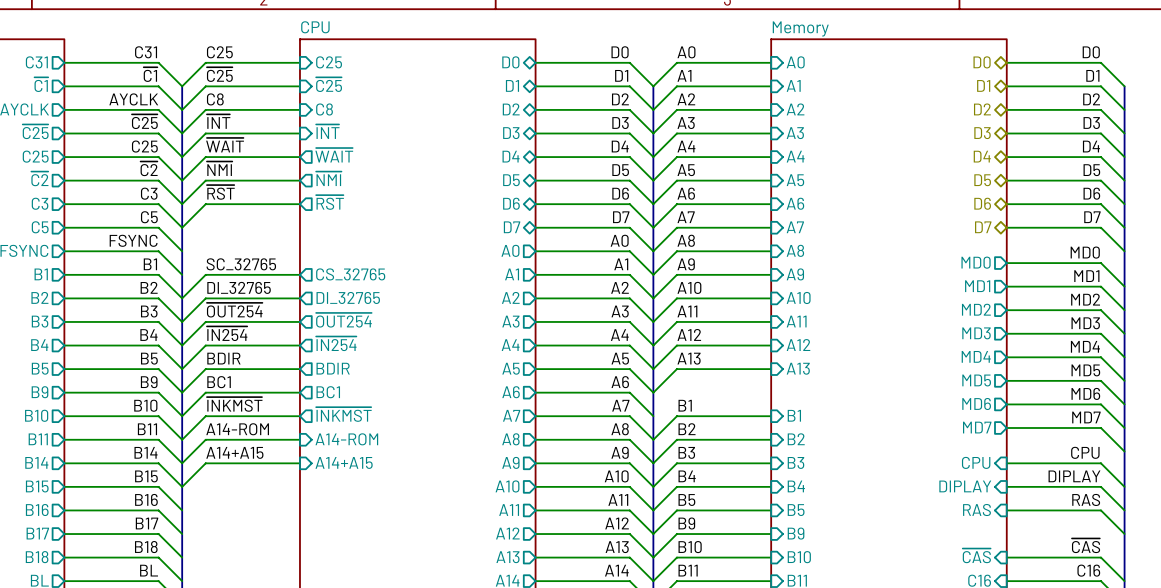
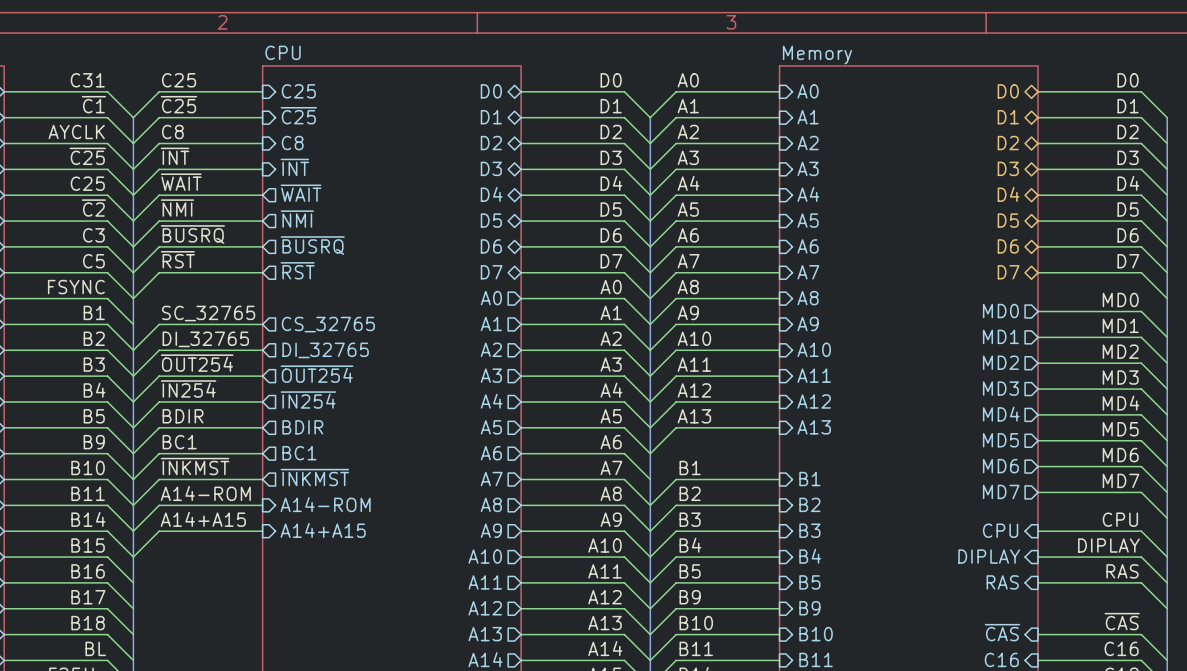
label: ~{RST} (220, 192) -> ~{BUSRQ} (192, 234)
sheet pin: ~{RST} (330, 202) -> ~{BUSRQ} (312, 245)
label: none -> ~{RST} (177, 259)
sheet pin: none -> ~{RST} (297, 270)
wire: none -> (262, 272) (159, 272) (133, 298)

